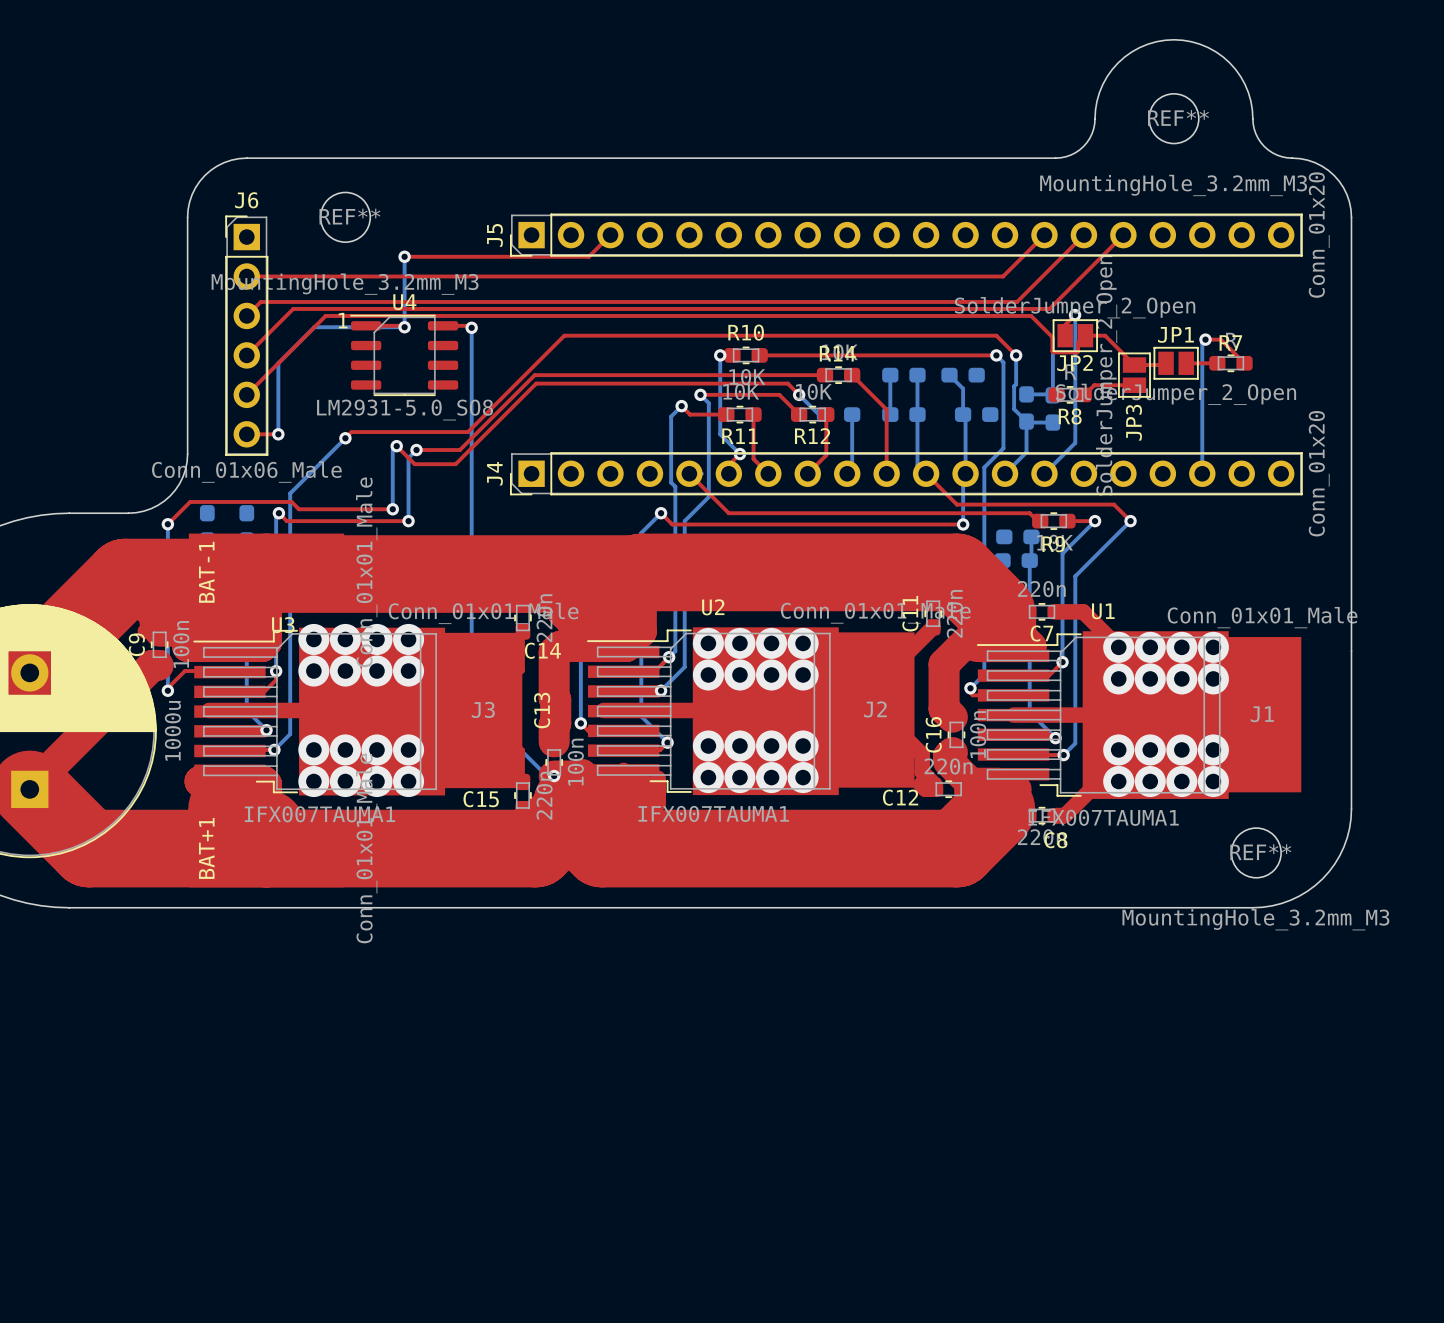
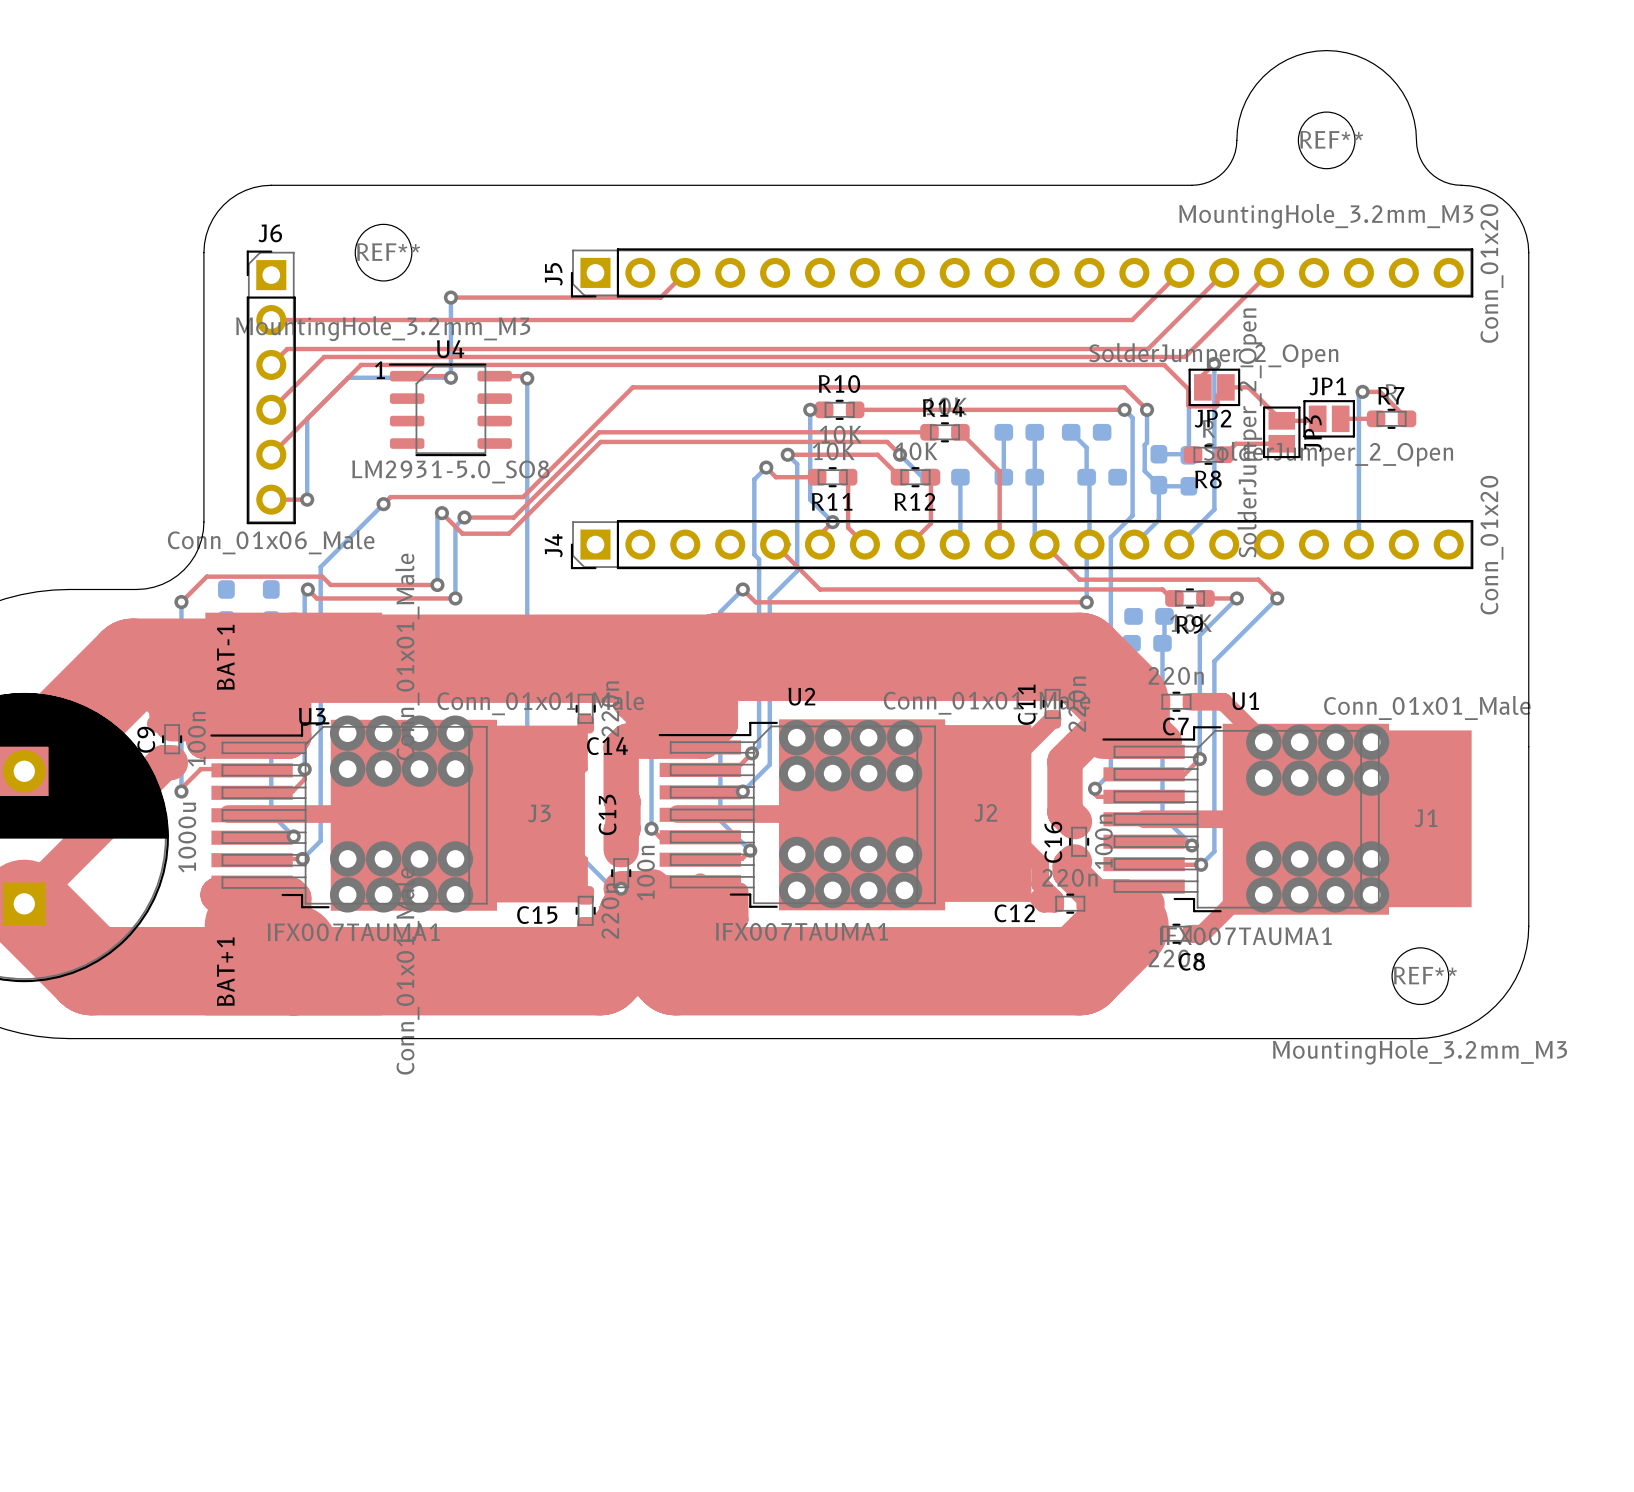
JP3 name position: JP3 (1133, 422) -> JP3 (1313, 433)

